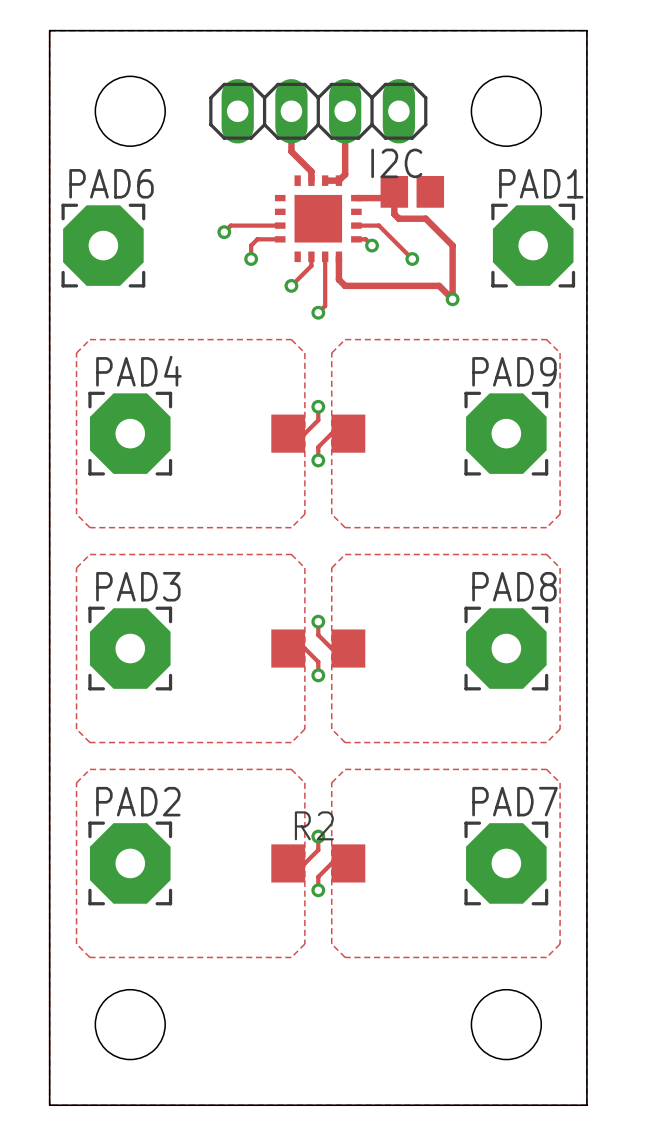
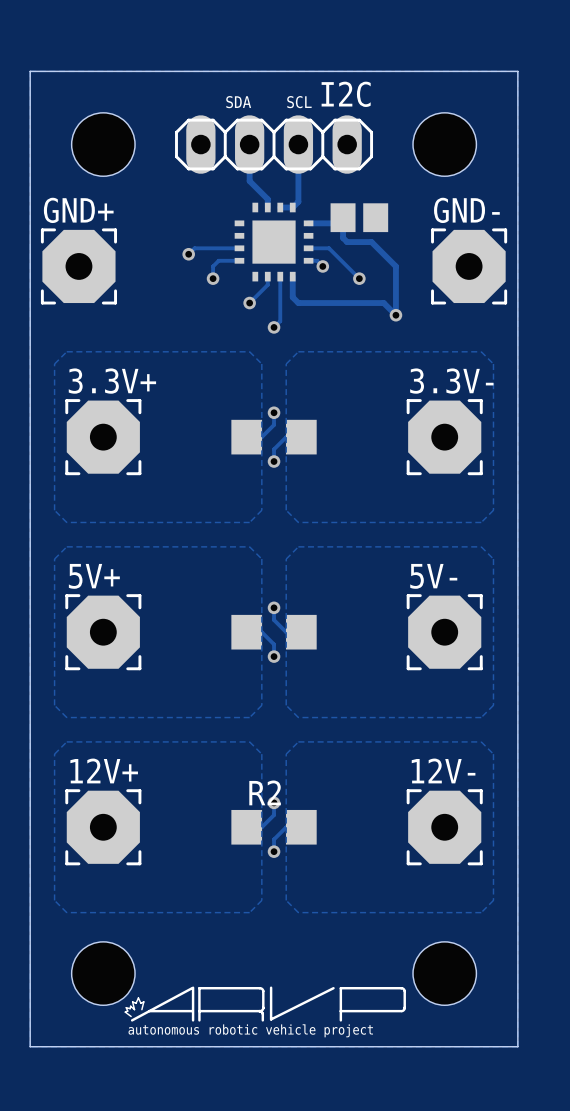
text: none -> SDA (238, 102)
text: none -> SCL (299, 102)
I2C name position: I2C (396, 163) -> I2C (346, 94)
PAD6 name: PAD6 (111, 183) -> GND+ (78, 210)
PAD1 name: PAD1 (541, 183) -> GND- (466, 210)
PAD4 name: PAD4 (138, 371) -> 3.3V+ (112, 381)
PAD9 name: PAD9 (514, 371) -> 3.3V- (451, 381)
PAD3 name: PAD3 (138, 586) -> 5V+ (94, 576)
PAD8 name: PAD8 (514, 586) -> 5V- (433, 576)
PAD2 name: PAD2 (138, 801) -> 12V+ (104, 770)
PAD7 name: PAD7 (515, 801) -> 12V- (443, 770)
drawing: none -> [124, 986, 406, 1022]

